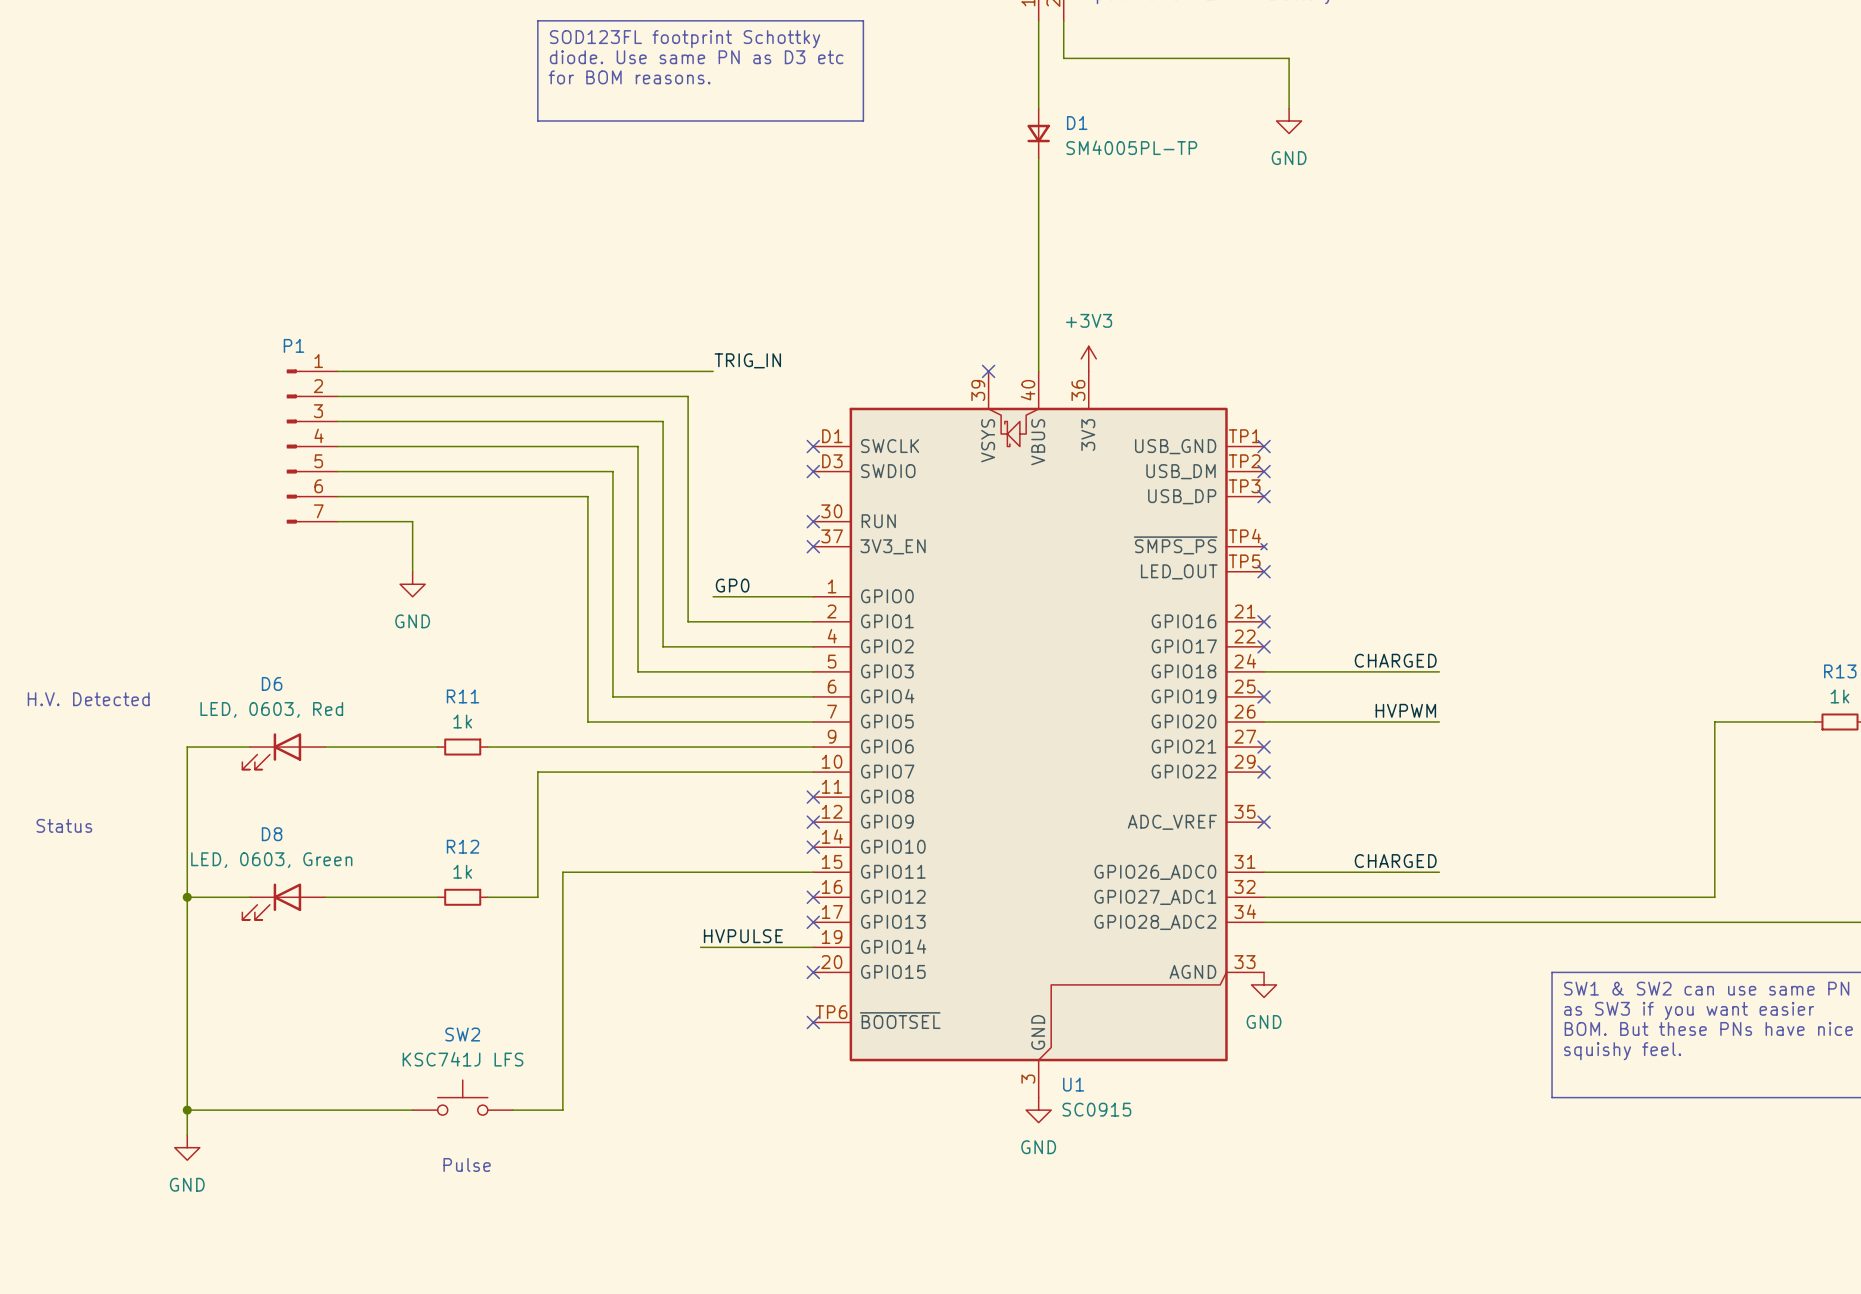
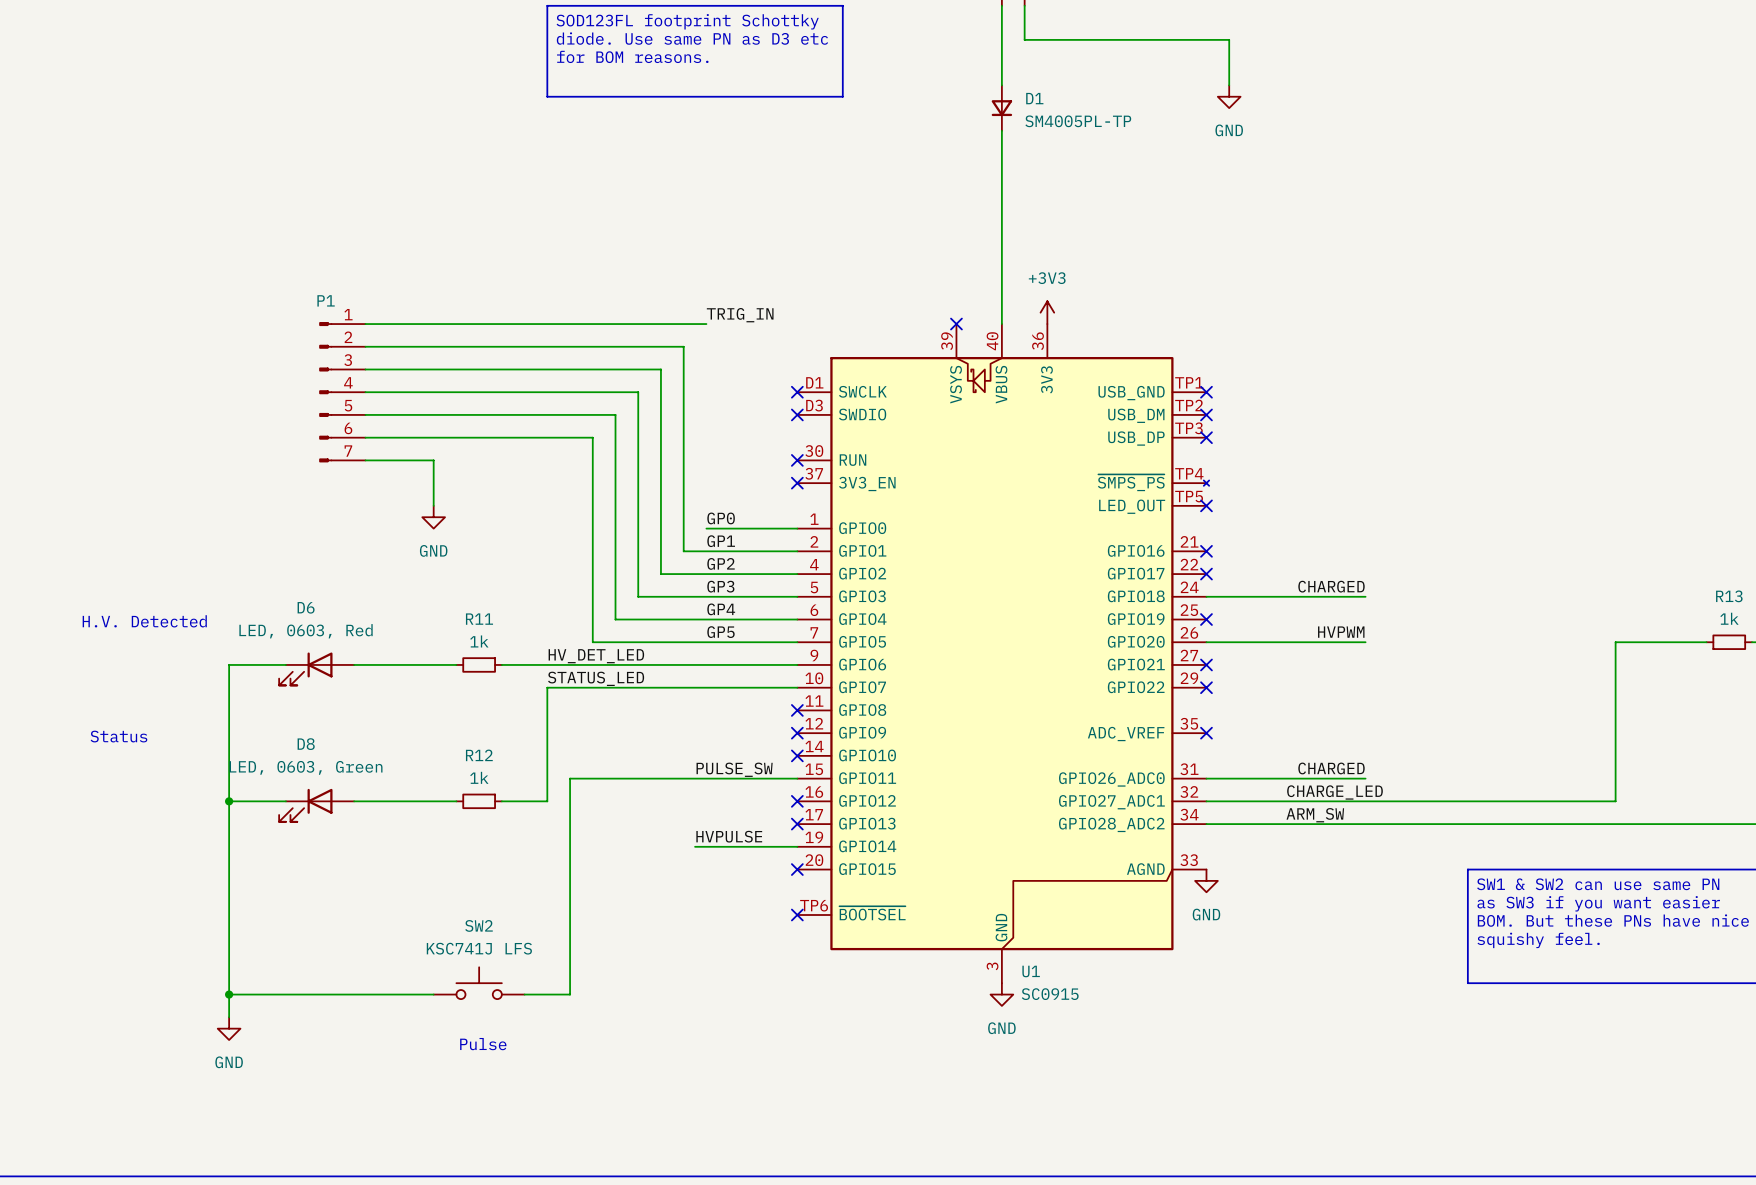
label: none -> GP1 (721, 541)
label: none -> GP2 (721, 563)
label: none -> GP3 (720, 586)
label: none -> GP4 (721, 609)
label: none -> GP5 (720, 632)
label: none -> HV_DET_LED (596, 656)
label: none -> STATUS_LED (596, 678)
label: none -> PULSE_SW (734, 769)
label: none -> CHARGE_LED (1334, 792)
label: none -> ARM_SW (1315, 815)

